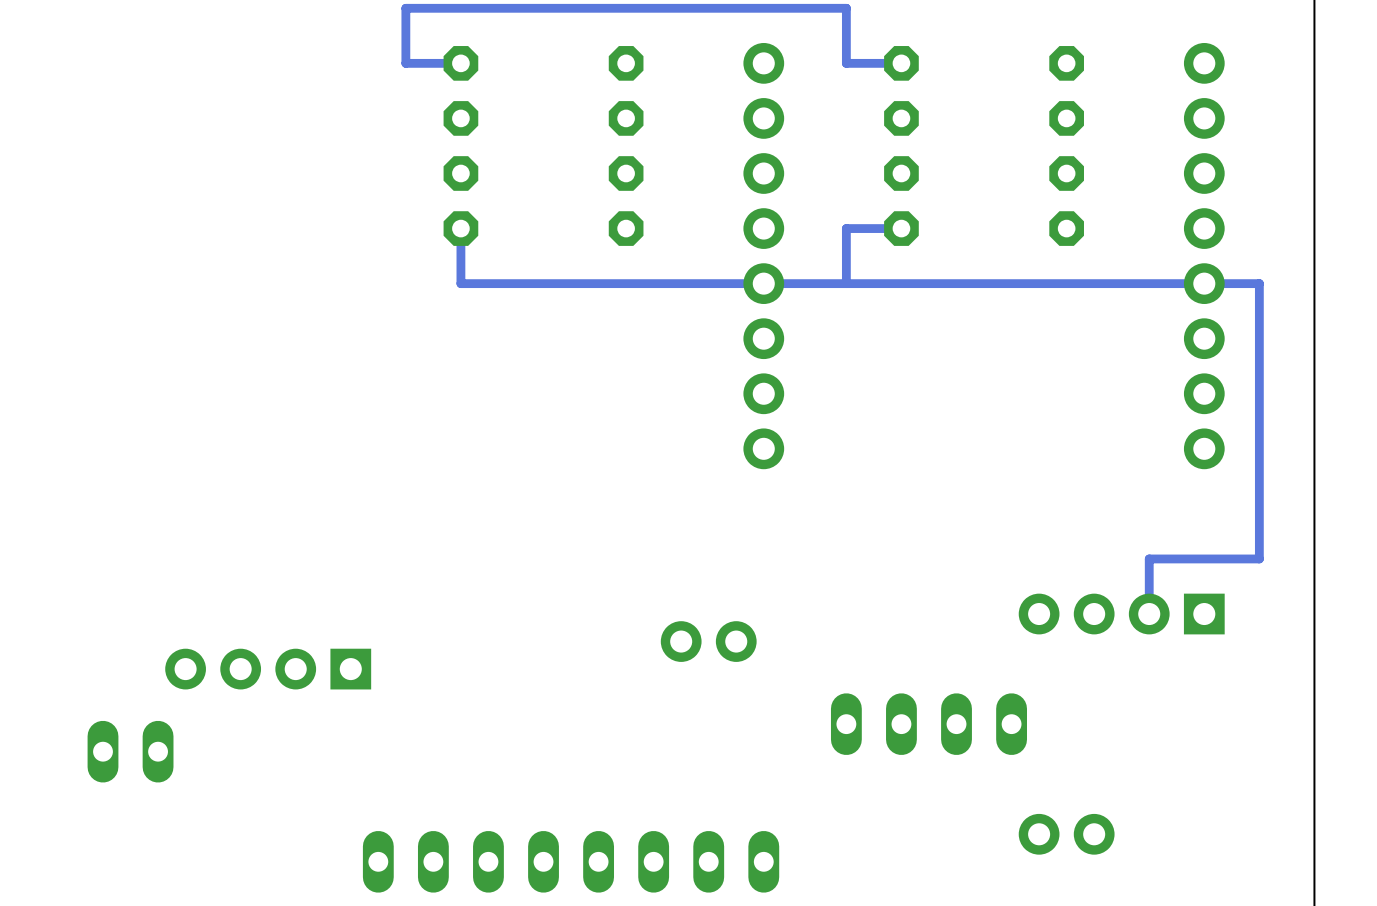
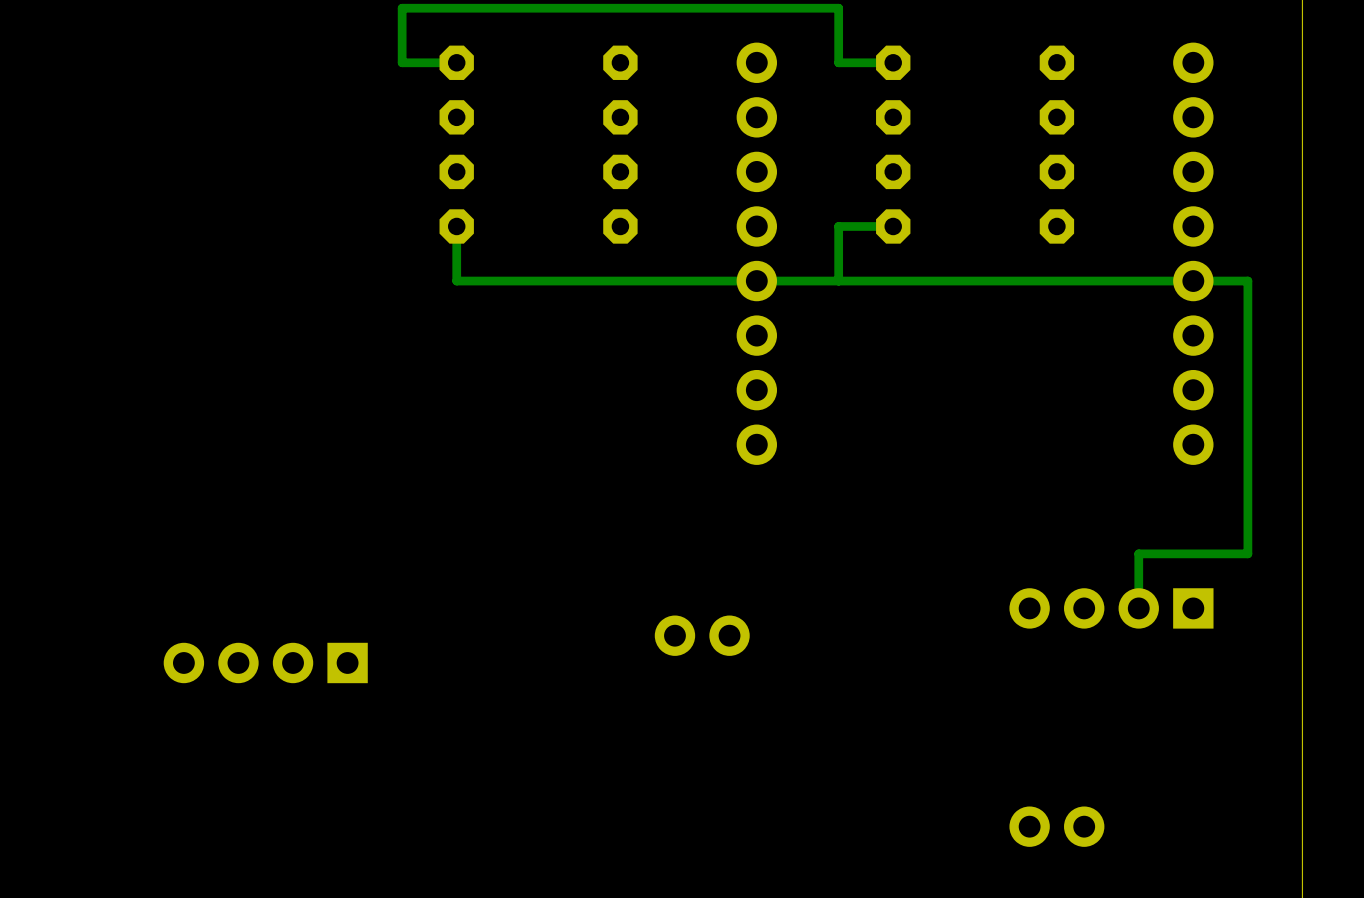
part: (928, 724) -> none
part: (130, 751) -> none
part: (571, 861) -> none

